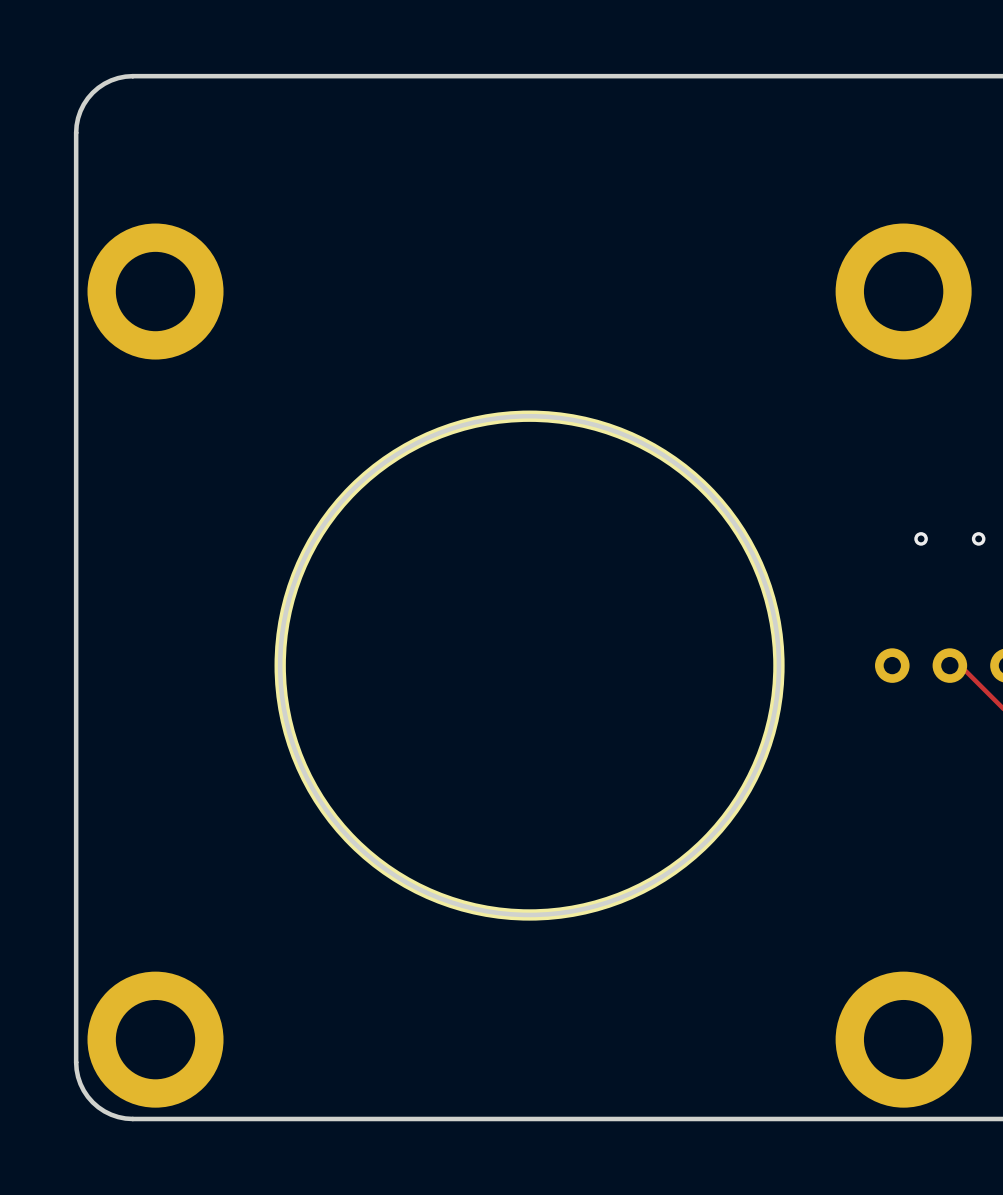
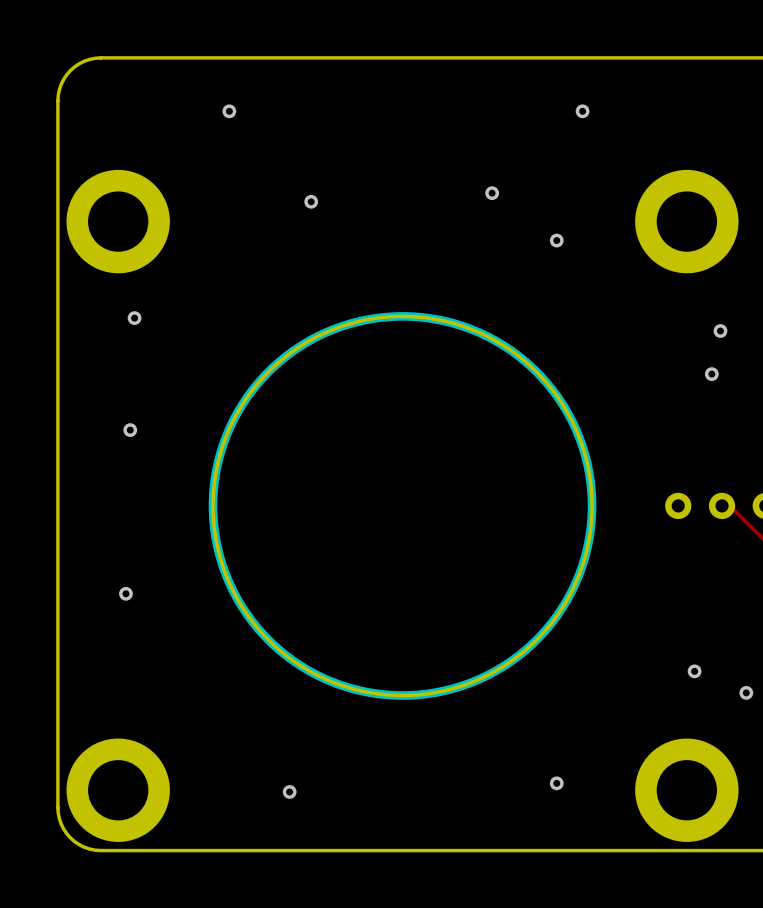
via: none -> (229, 111)
via: none -> (582, 111)
via: none -> (492, 193)
via: none -> (311, 201)
via: none -> (556, 240)
via: none -> (134, 318)
via: none -> (720, 331)
via: none -> (711, 374)
via: (921, 538) -> none
via: (978, 538) -> none
via: none -> (130, 430)
via: none -> (125, 593)
via: none -> (694, 671)
via: none -> (746, 692)
via: none -> (556, 783)
via: none -> (289, 791)

